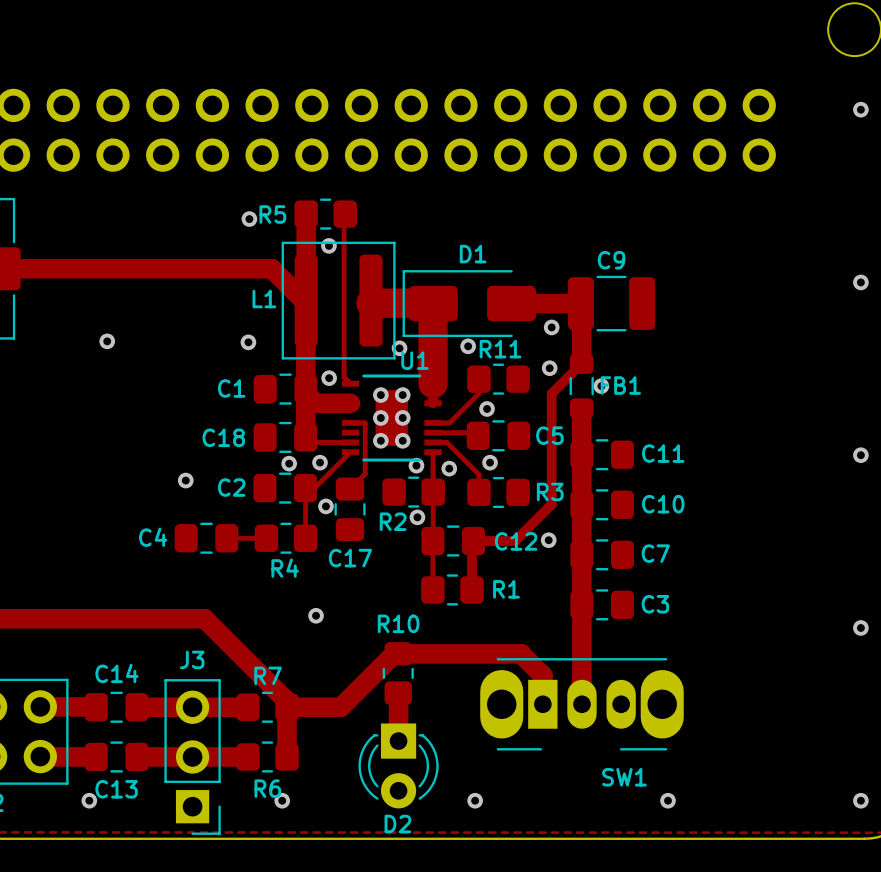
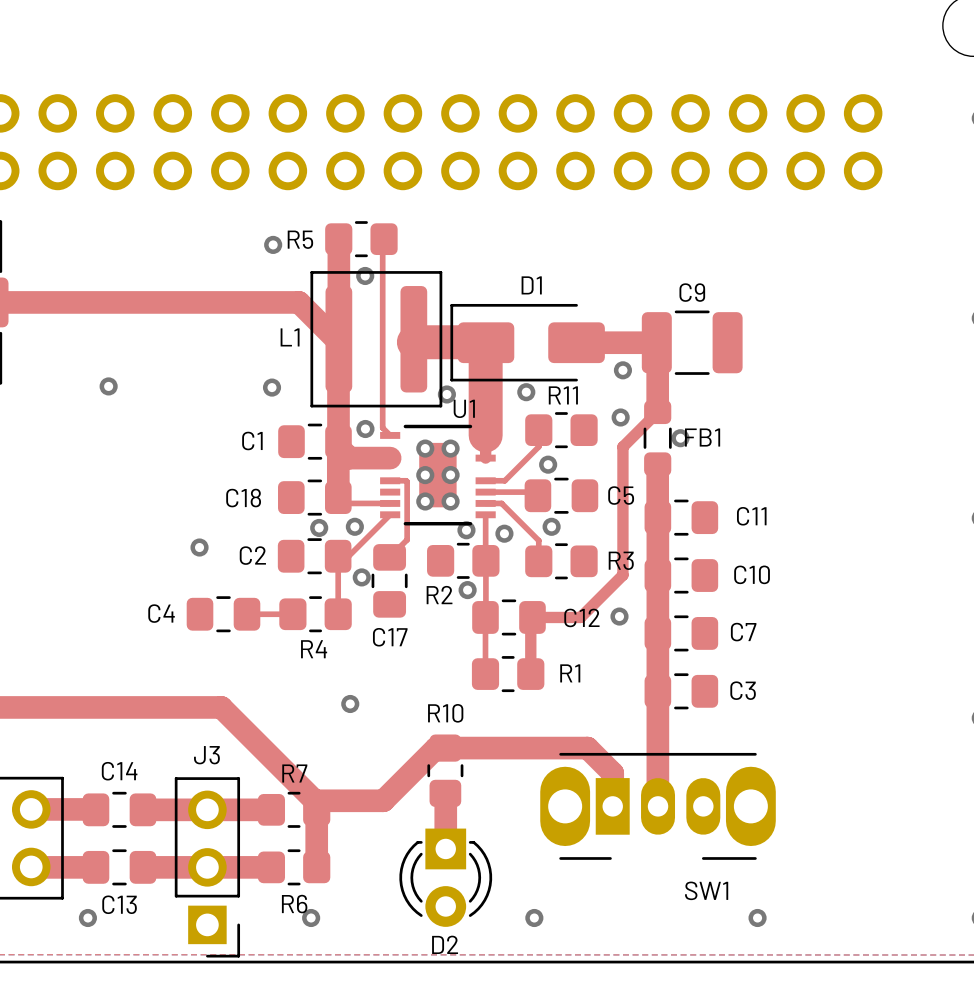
top track: (394, 653) (340, 707) (287, 707) -> none
top track: none -> (445, 748) (436, 748) (383, 800) (316, 800)

